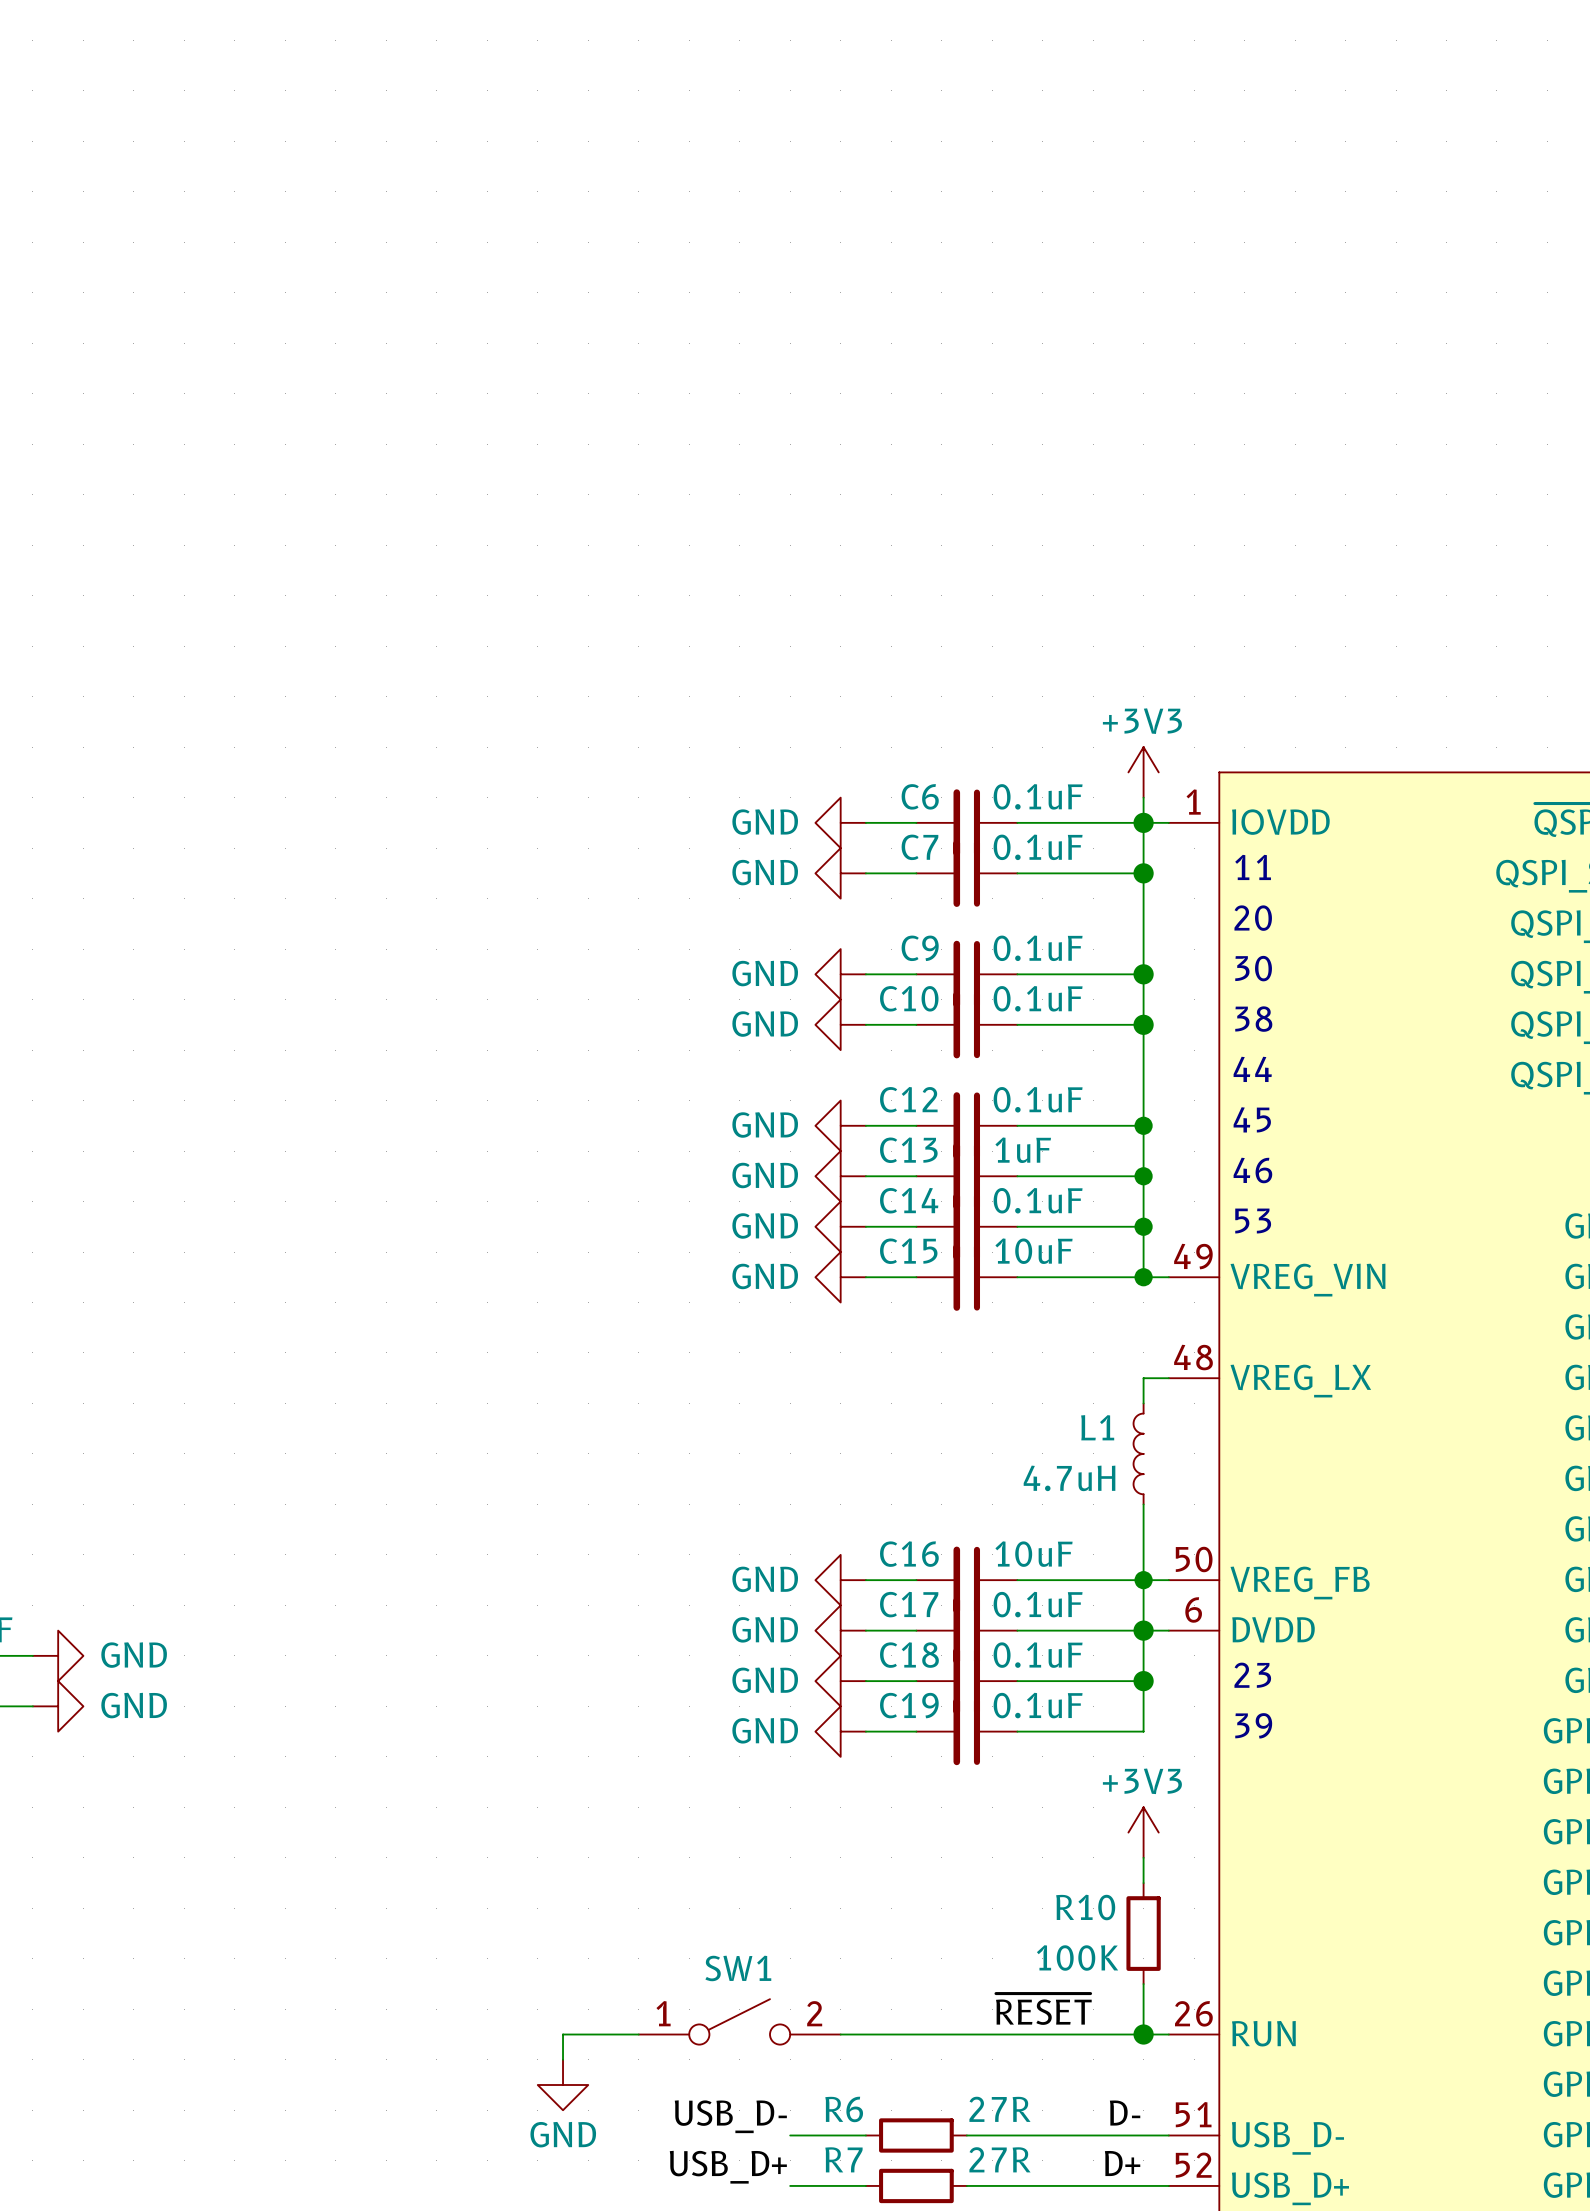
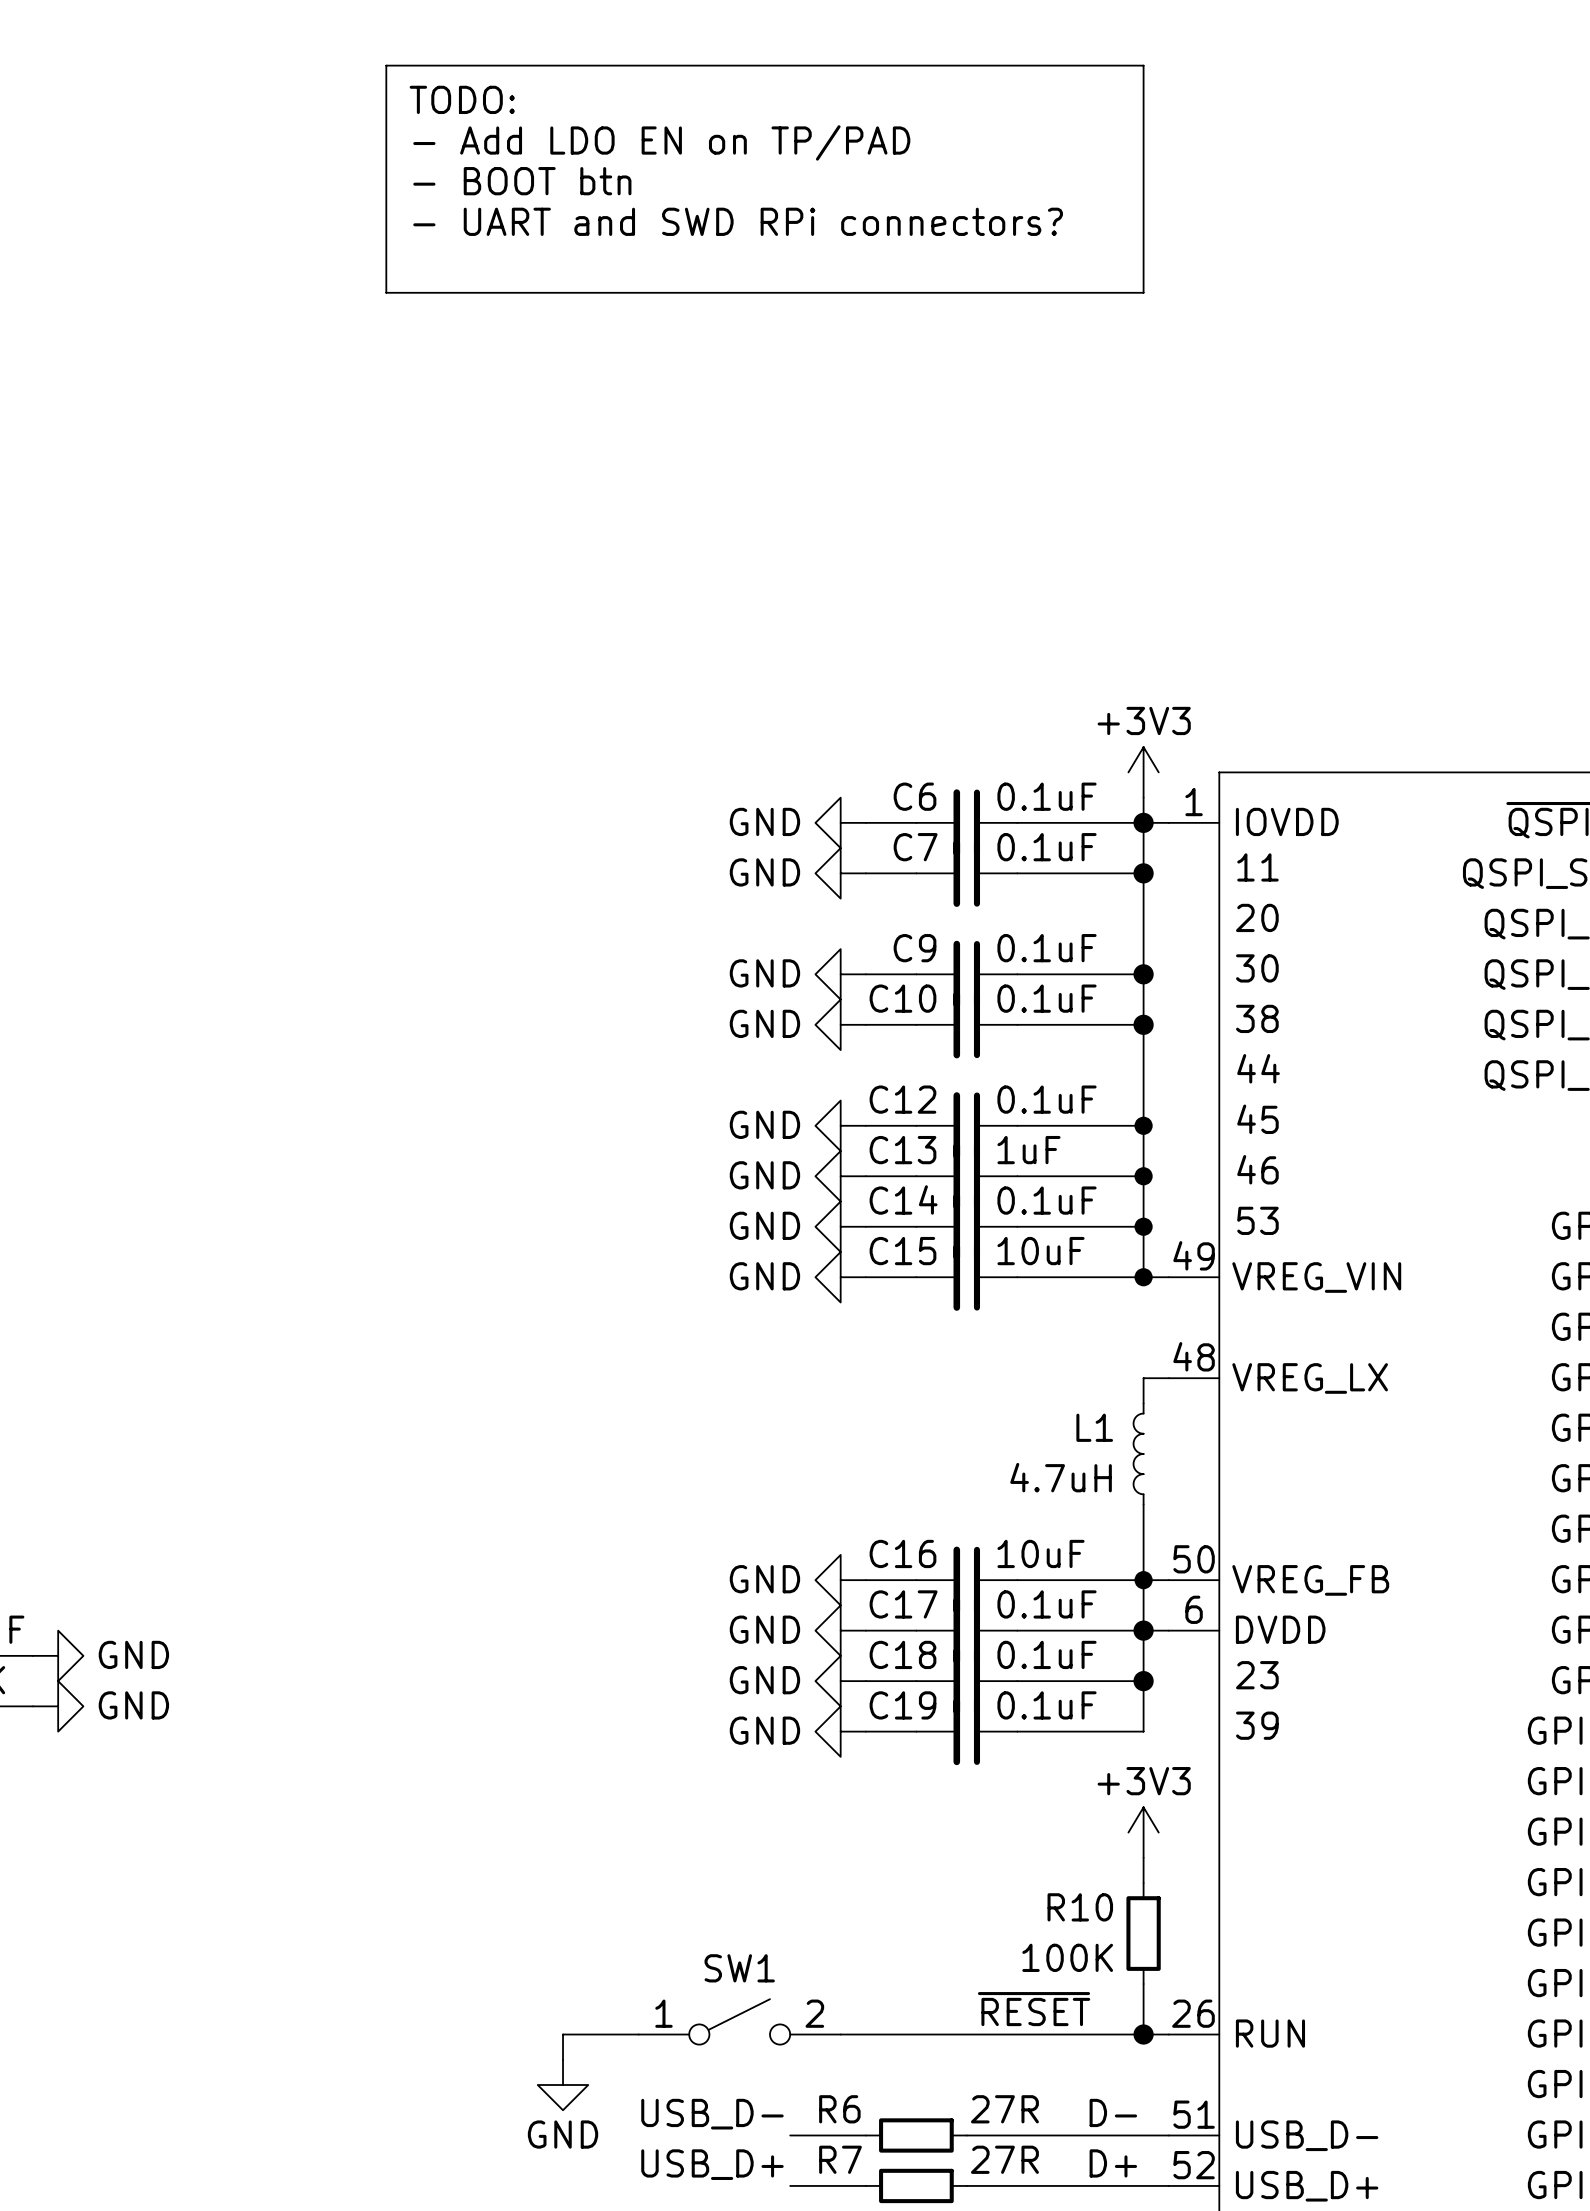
line: none -> (386, 65) (1143, 65) (1143, 292) (386, 292) (386, 65)
text: none -> TODO: (462, 99)
text: none -> - Add LDO EN on TP/PAD (661, 142)
text: none -> - BOOT btn (522, 181)
text: none -> - UART and SWD RPi connectors? (738, 221)

